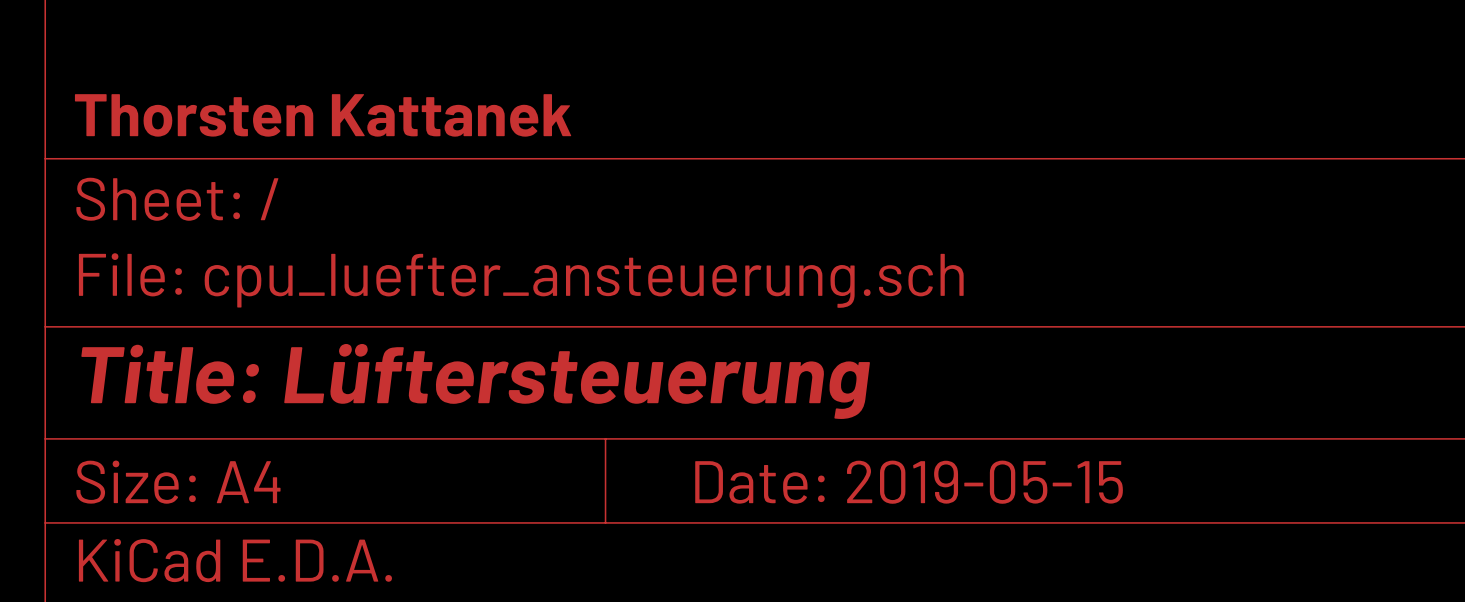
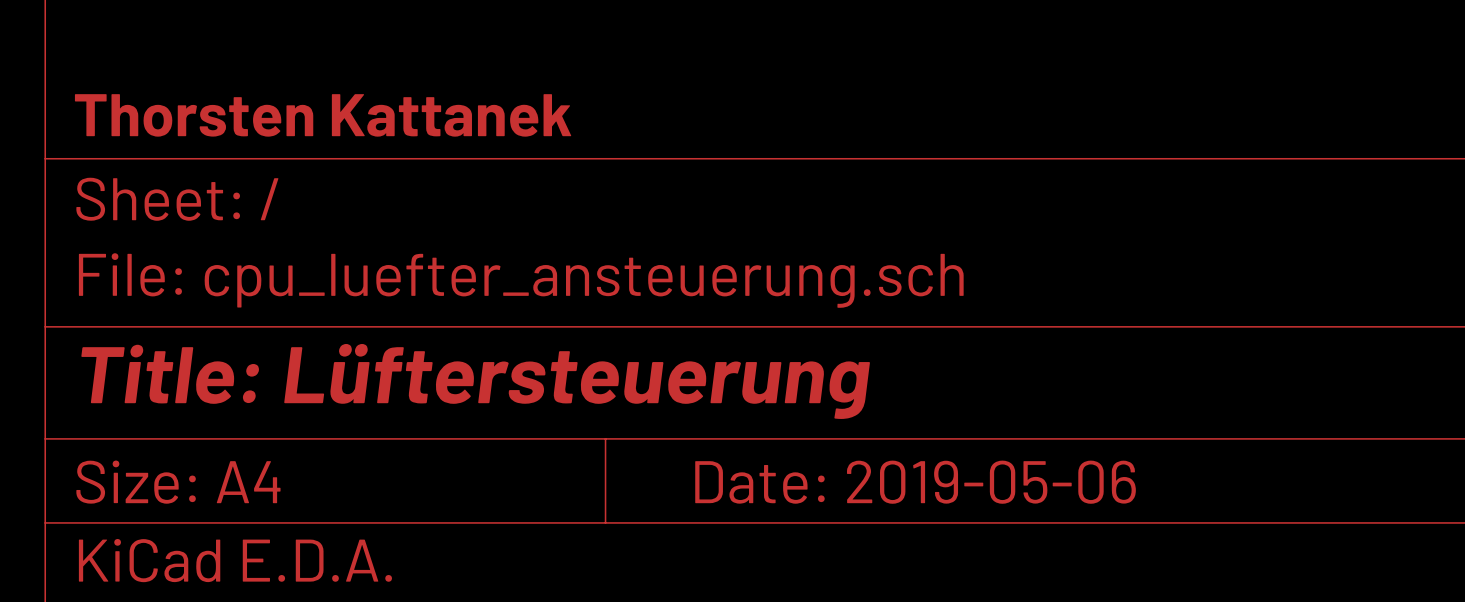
title block: Date: 2019-05-15 (909, 482) -> Date: 2019-05-06 (915, 482)

